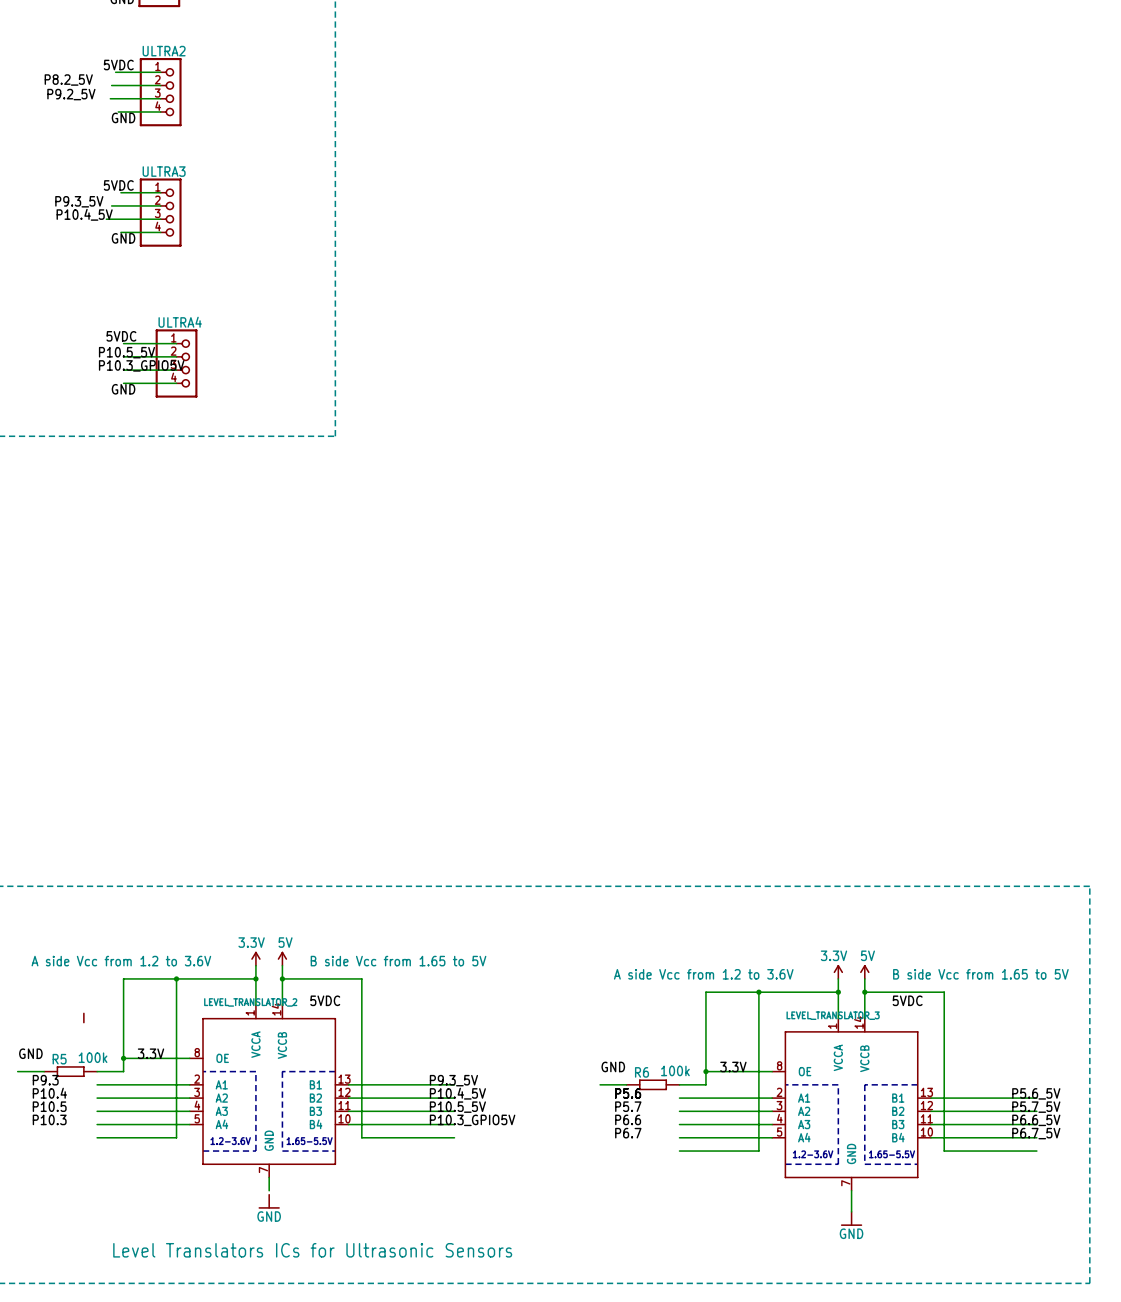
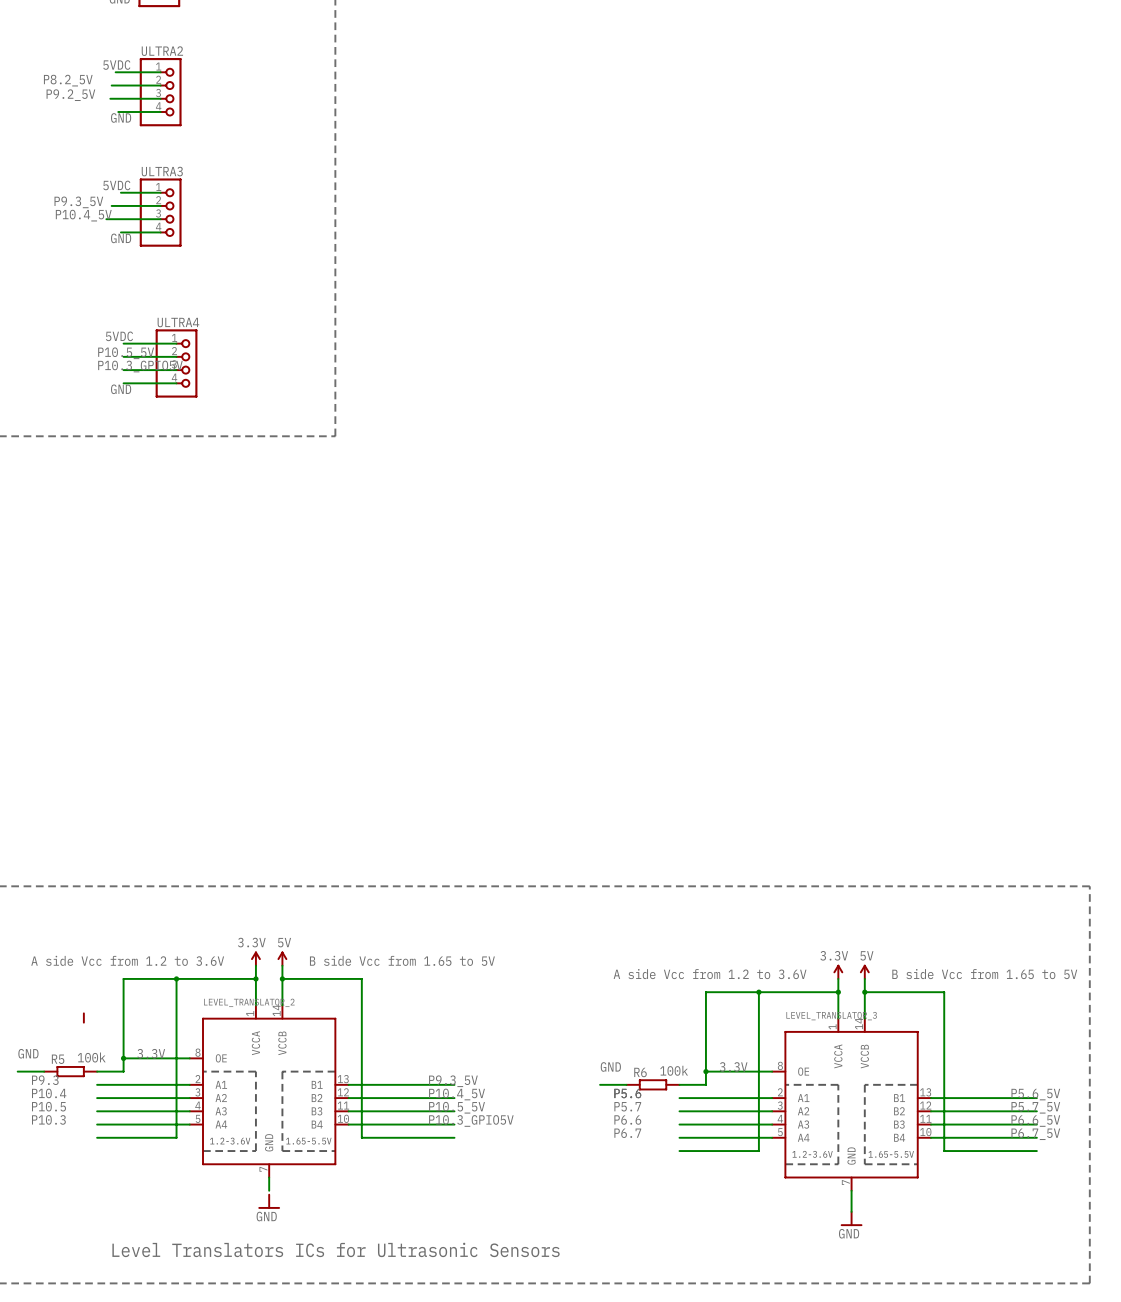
label: 5VDC (325, 1000) -> none
label: 5VDC (907, 1000) -> none

